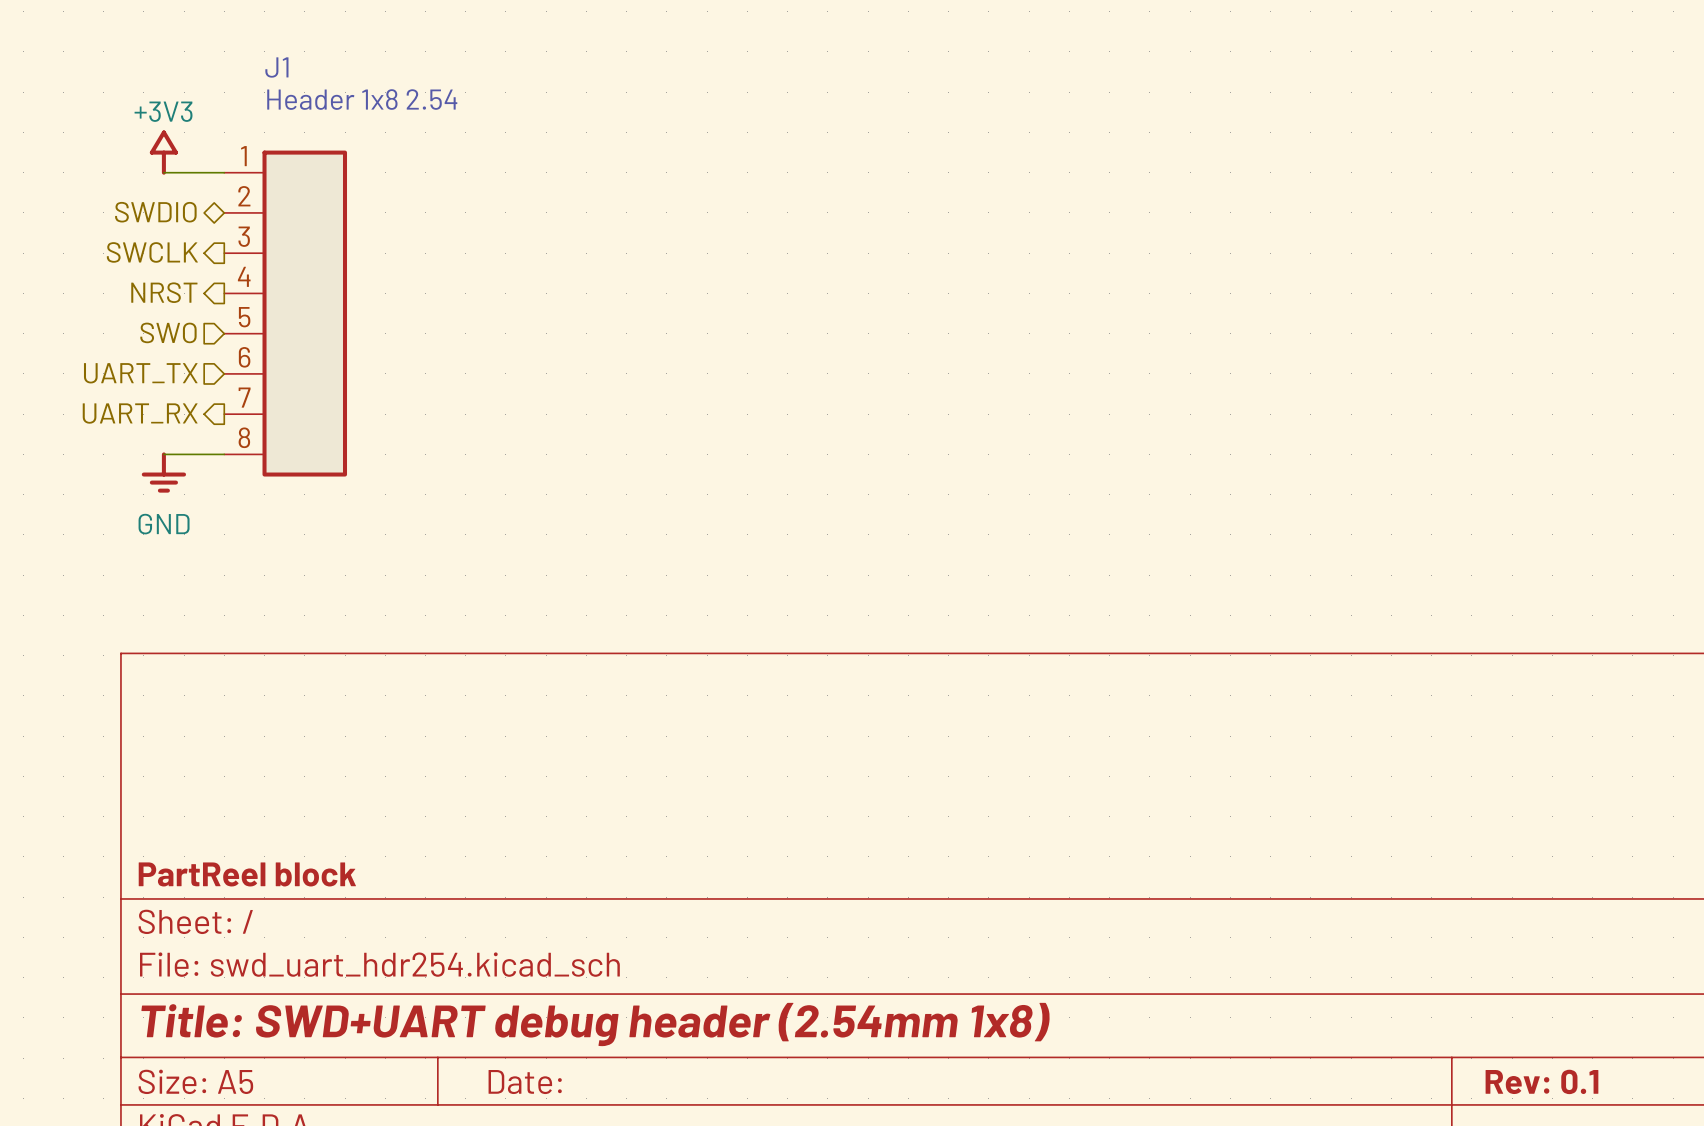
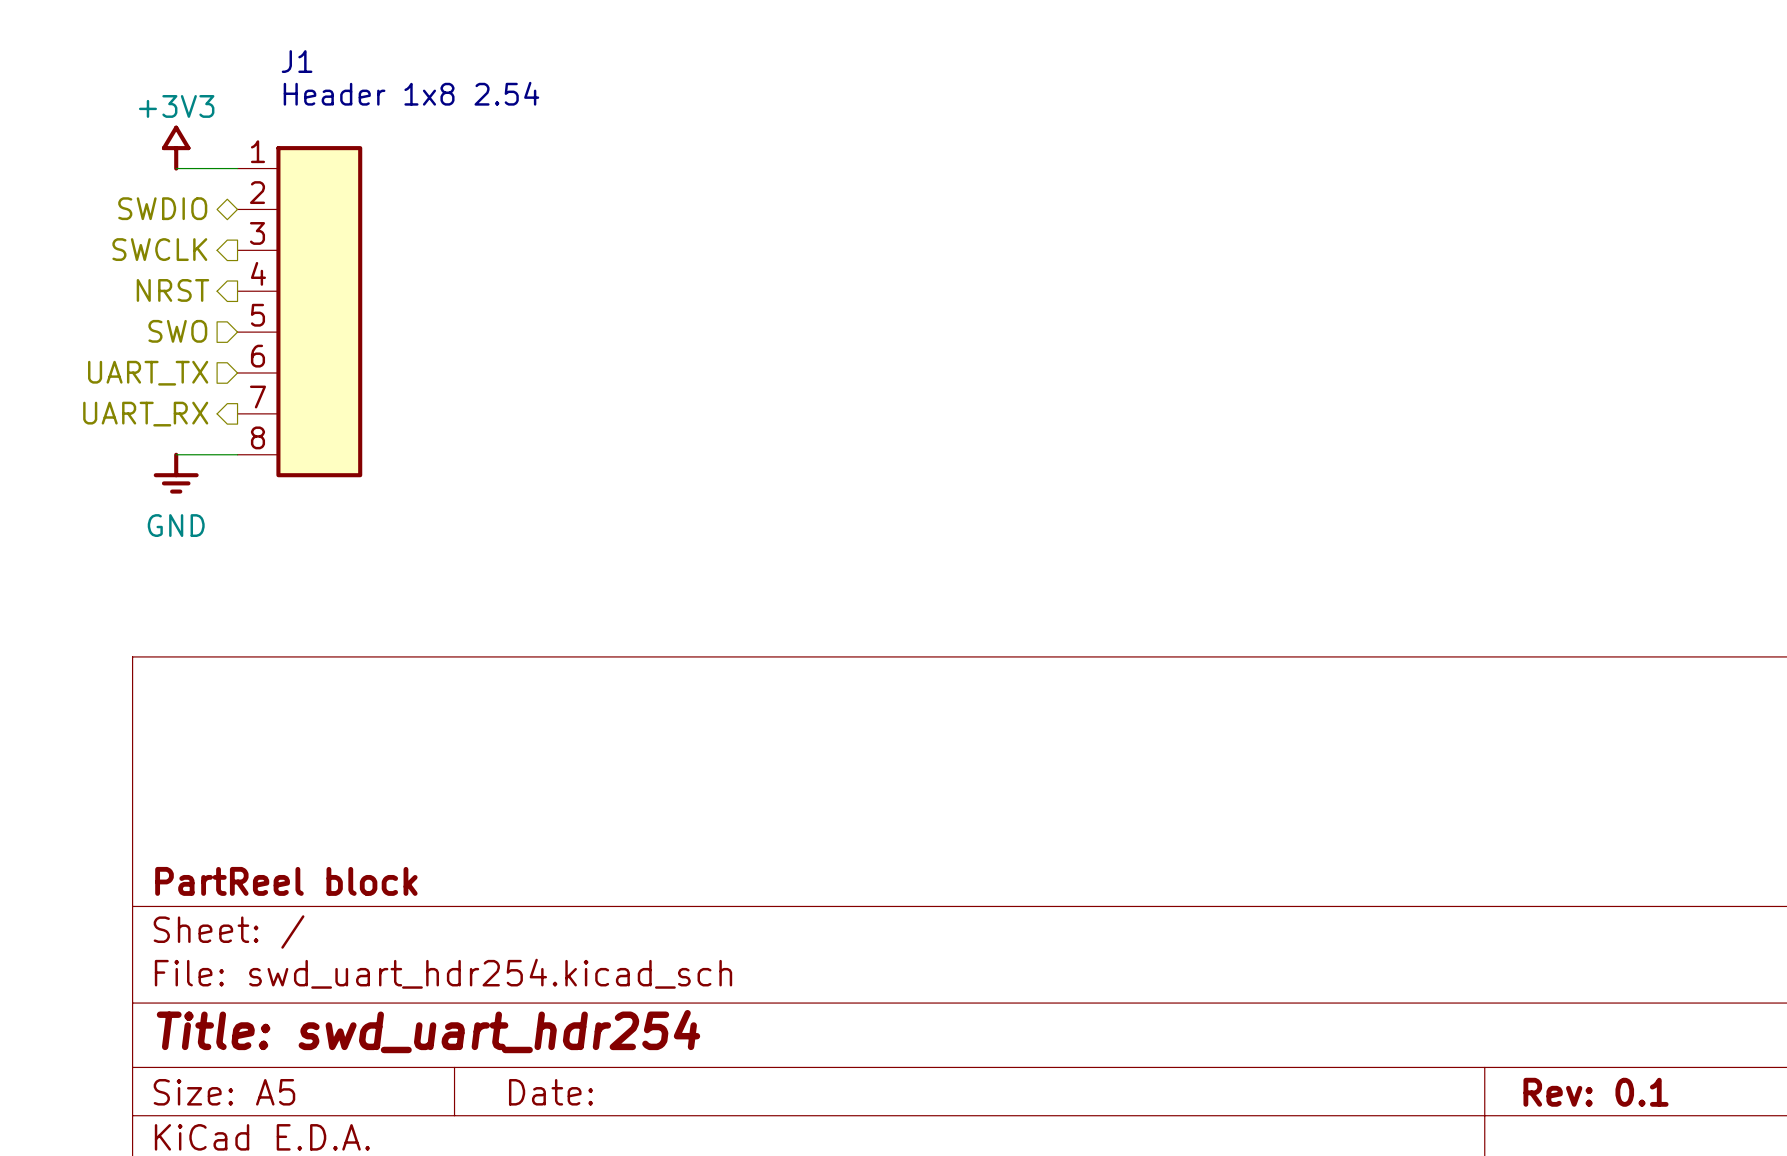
title block: Title: SWD+UART debug header (2.54mm 1x8) (595, 1024) -> Title: swd_uart_hdr254 (428, 1031)

